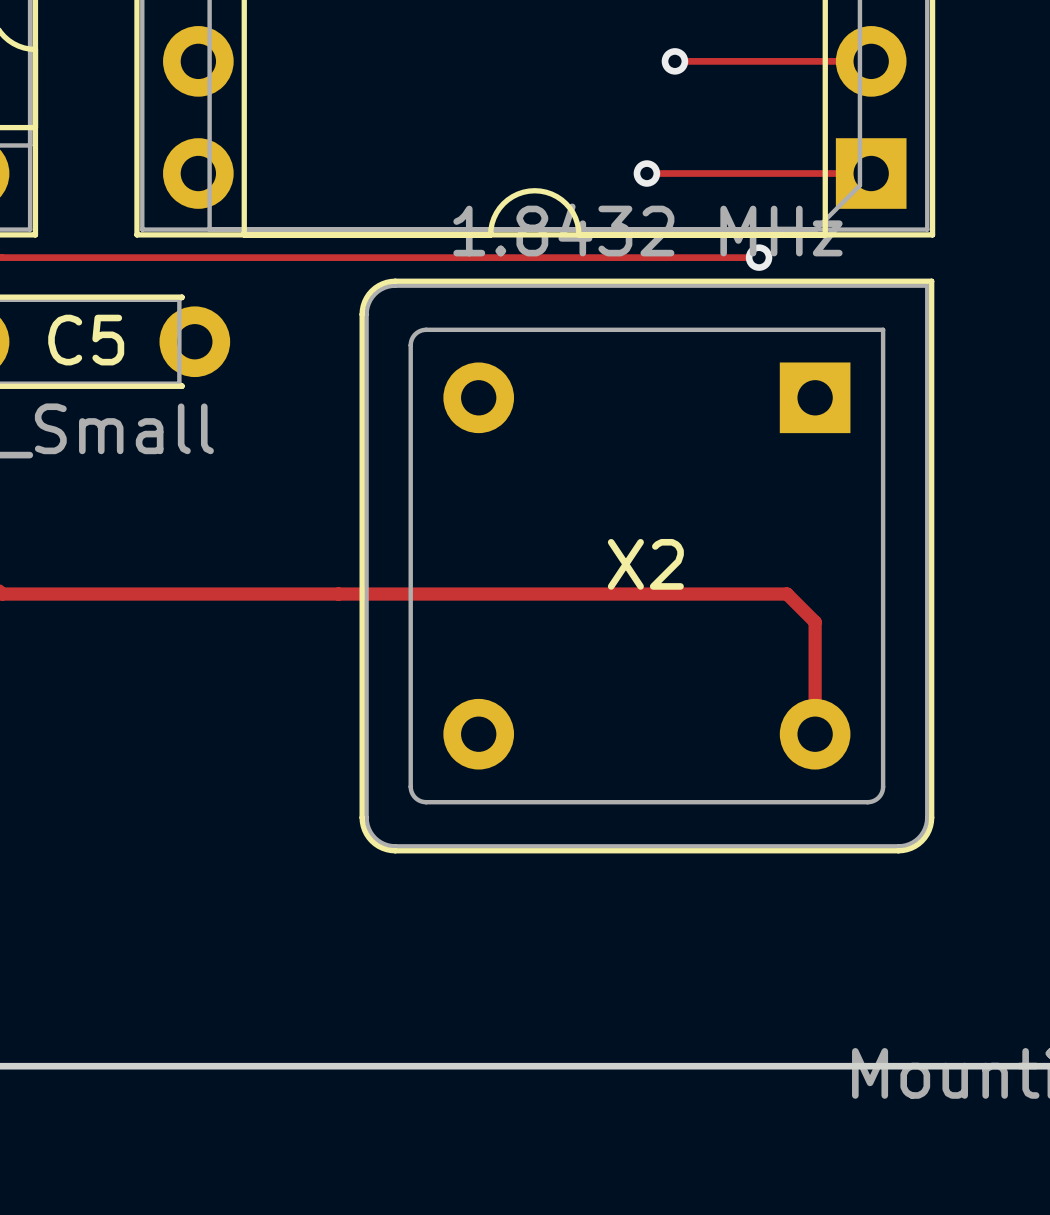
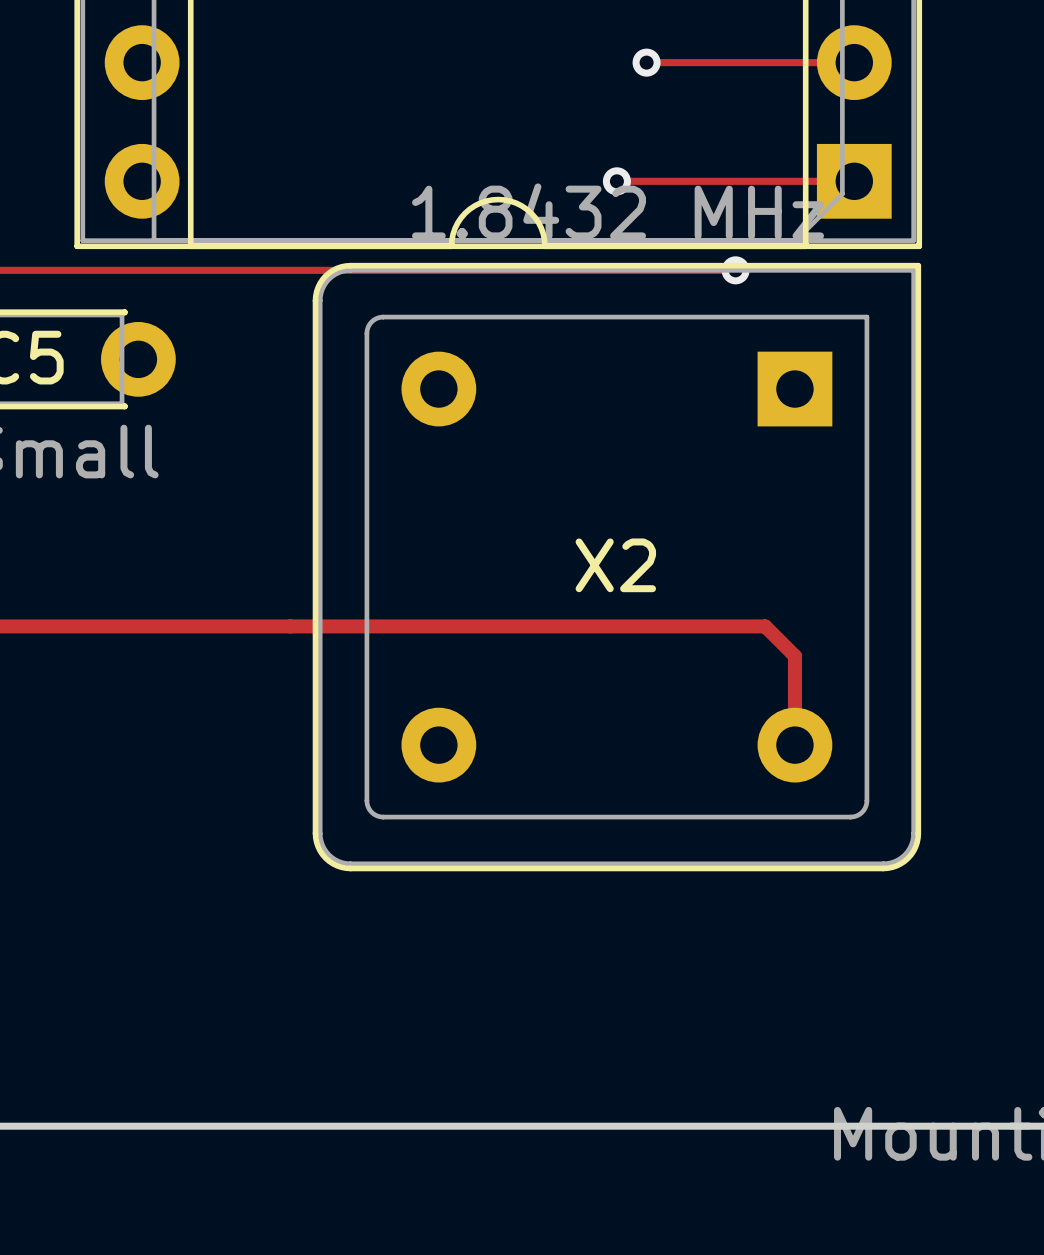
X2 position: (646, 566) -> (616, 567)

